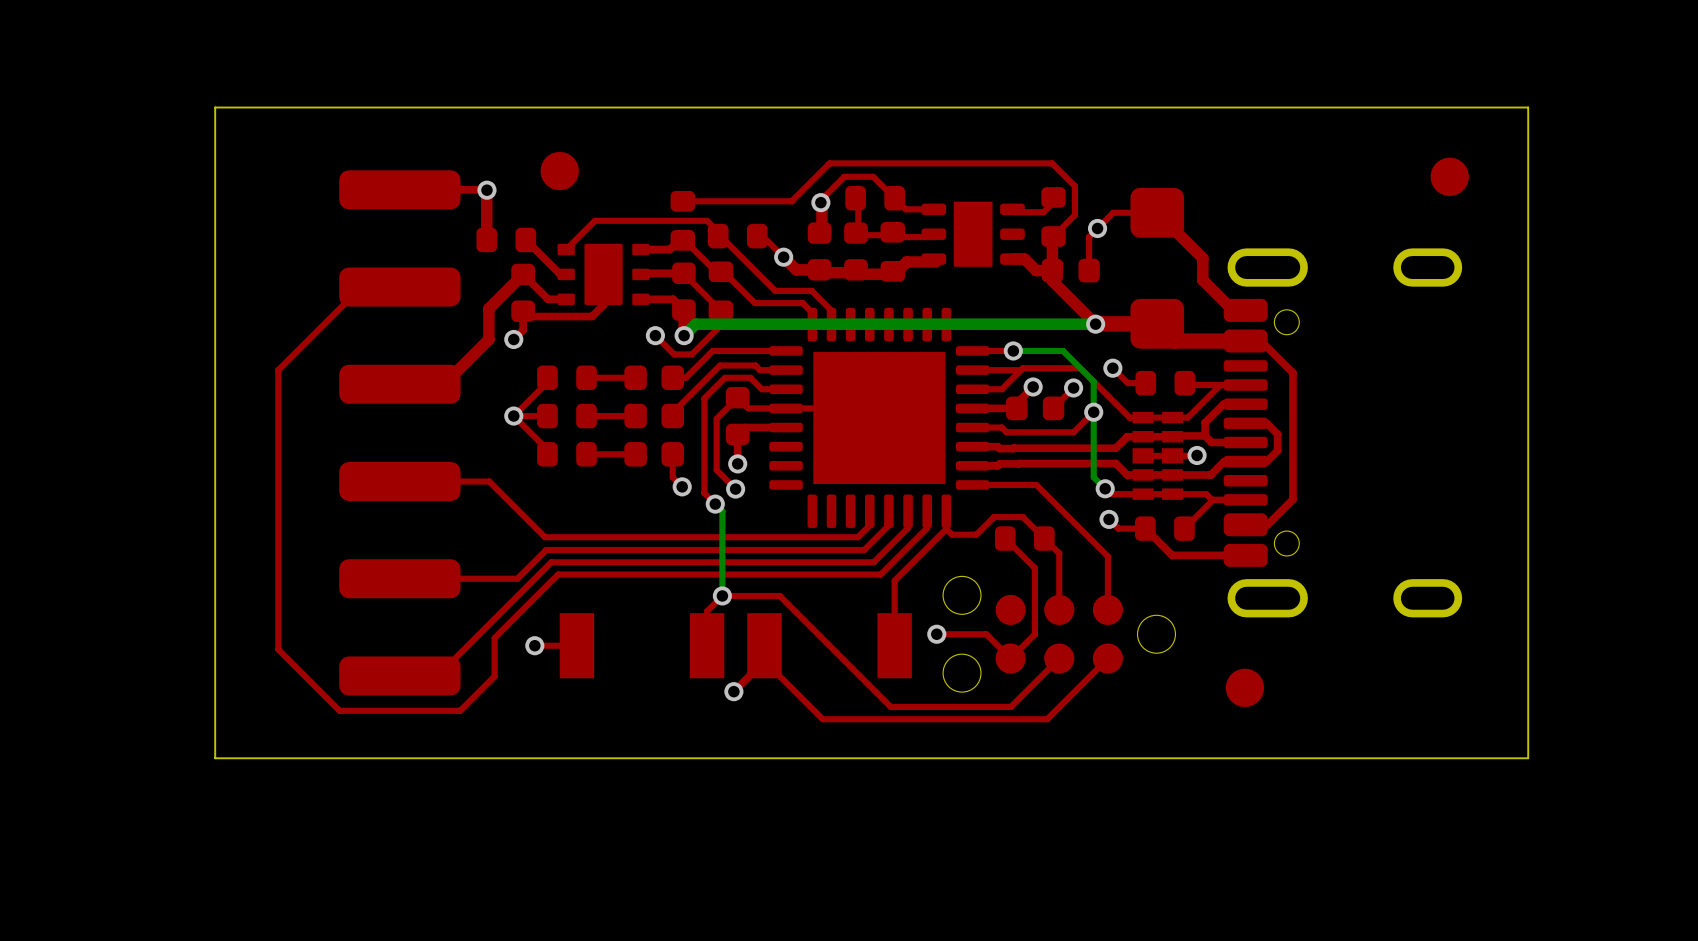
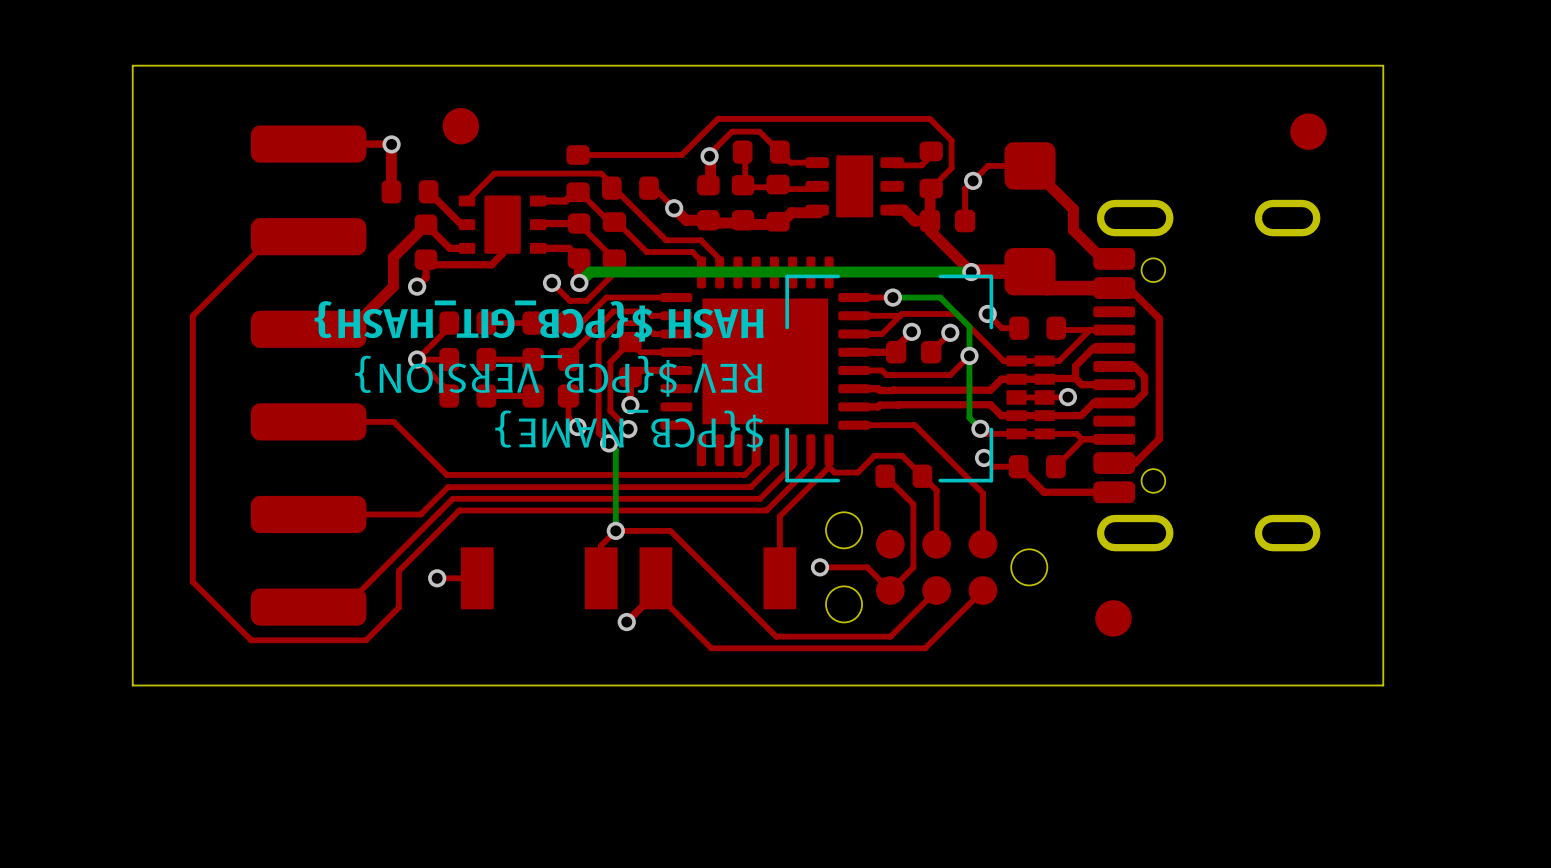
drawing: none -> [785, 274, 994, 483]

